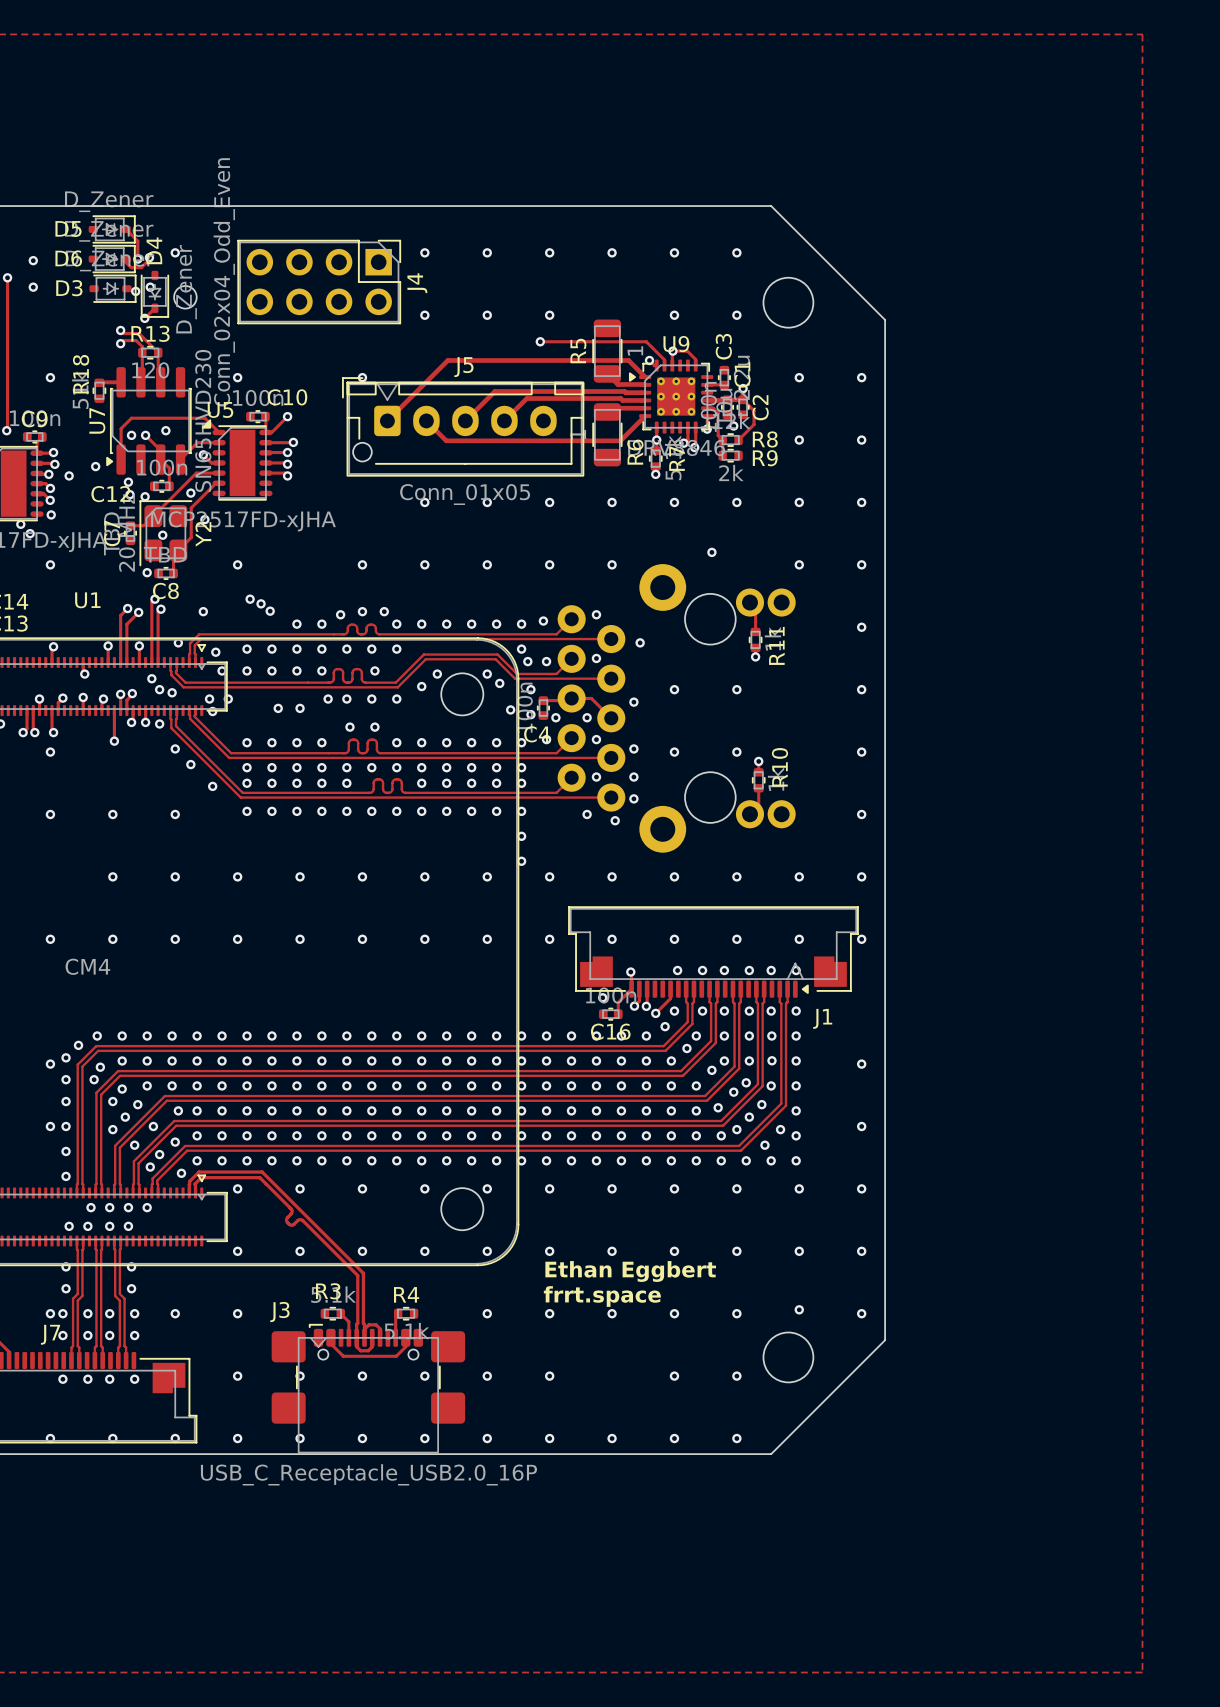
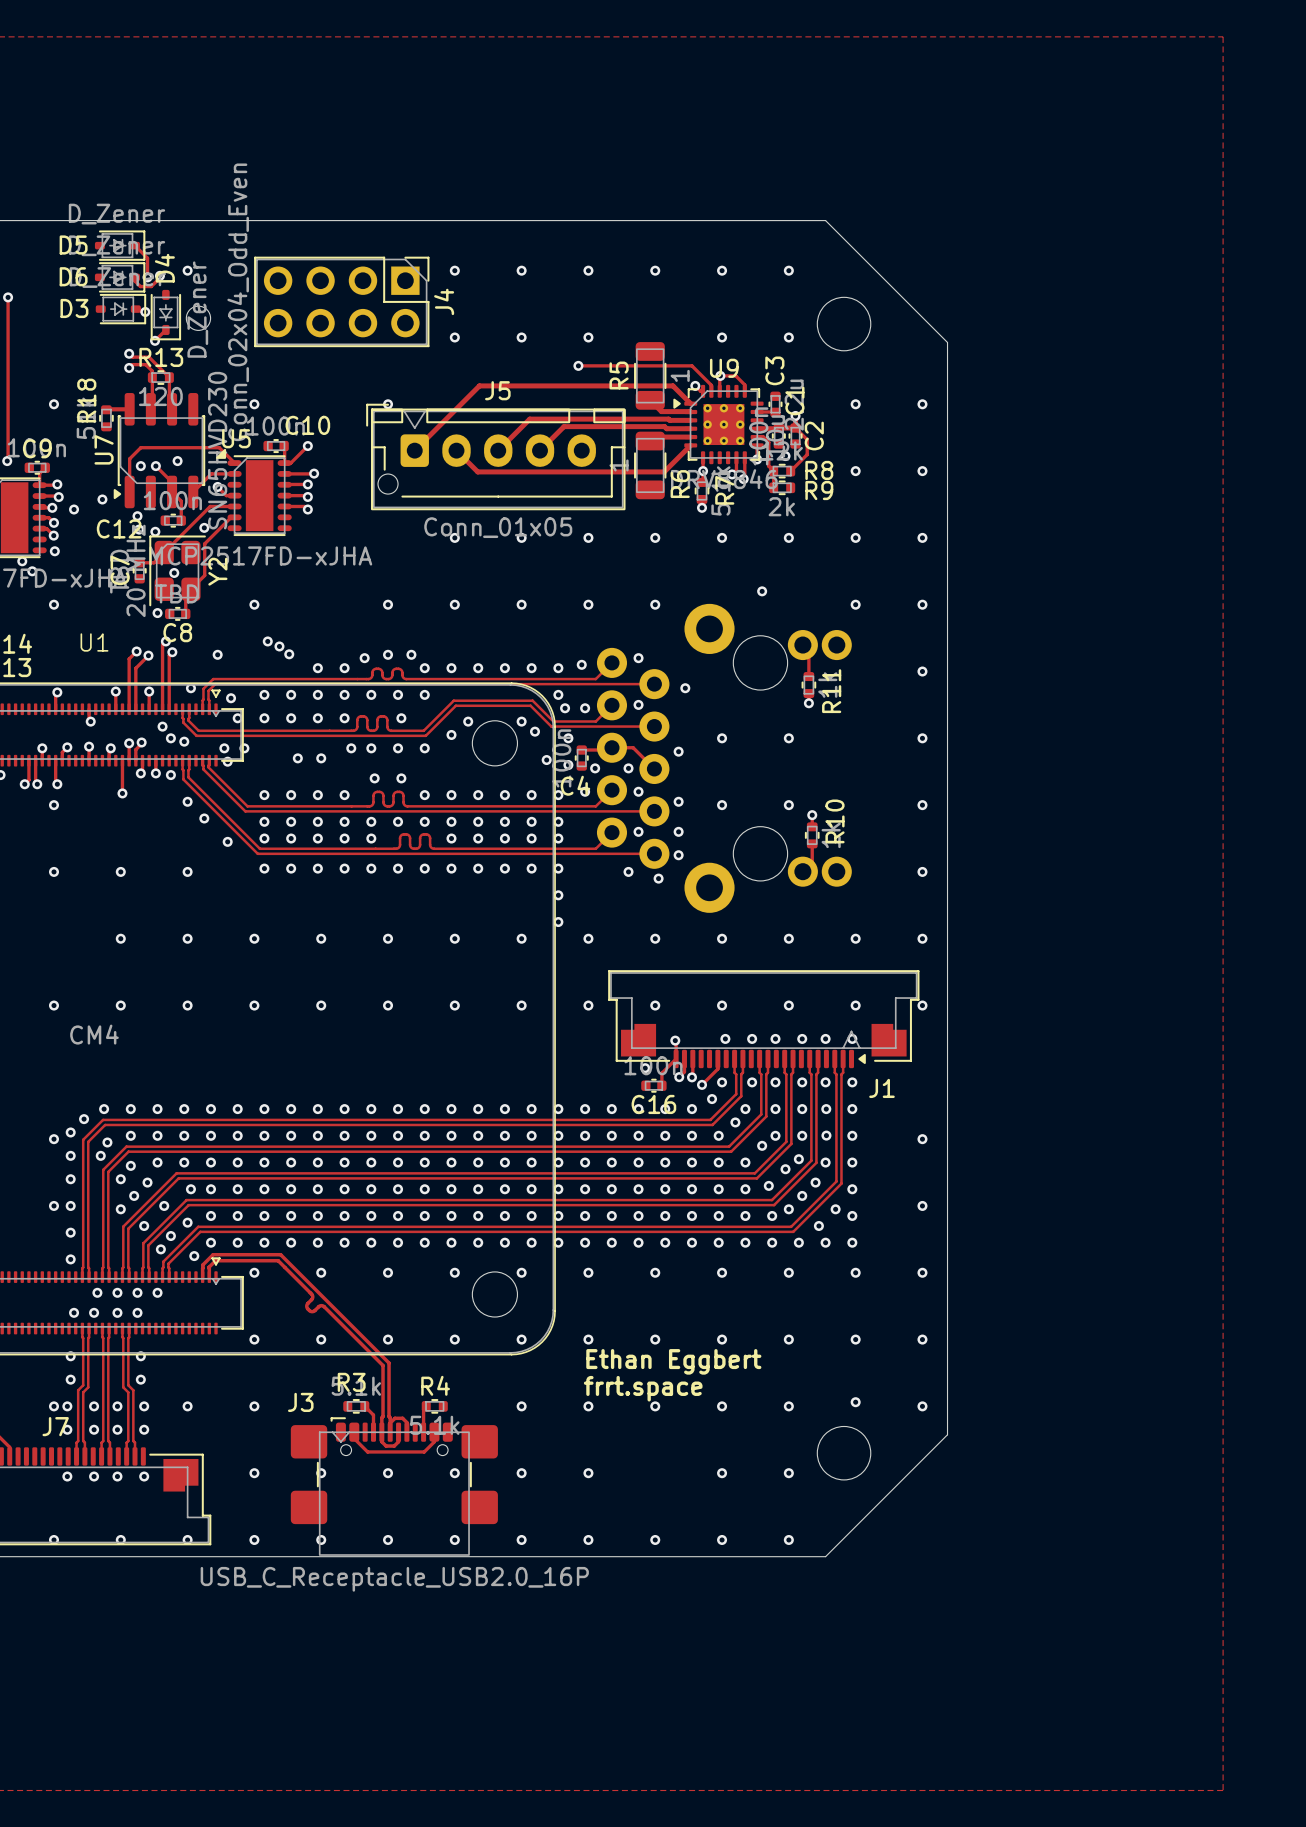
via: (33, 260) -> none
via: (33, 287) -> none
via: (150, 287) -> none
via: (204, 519) -> none

